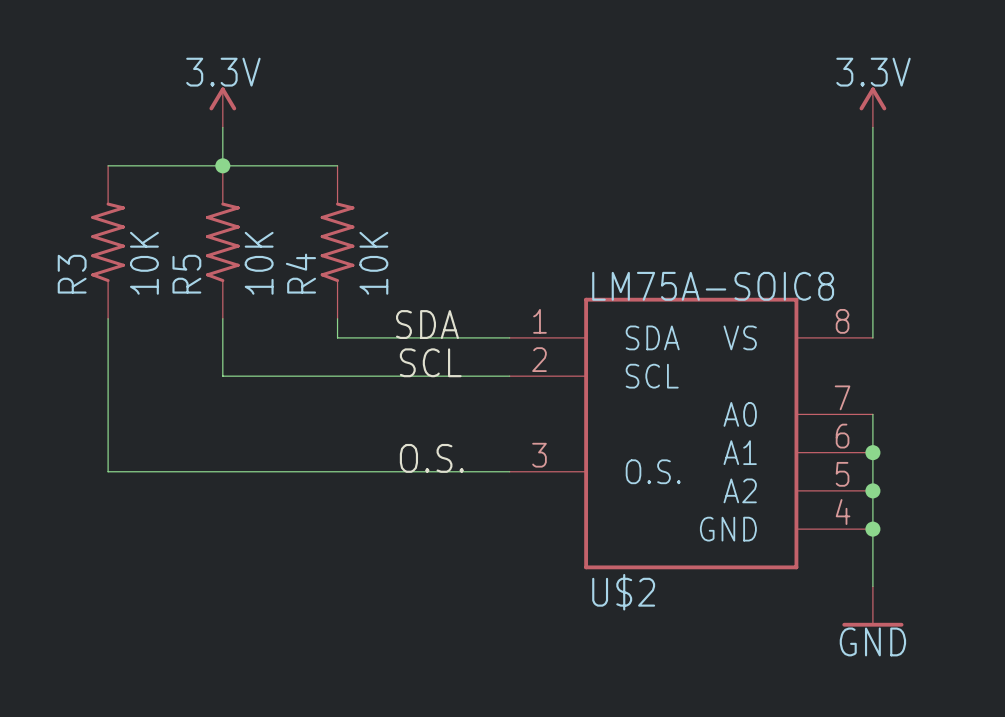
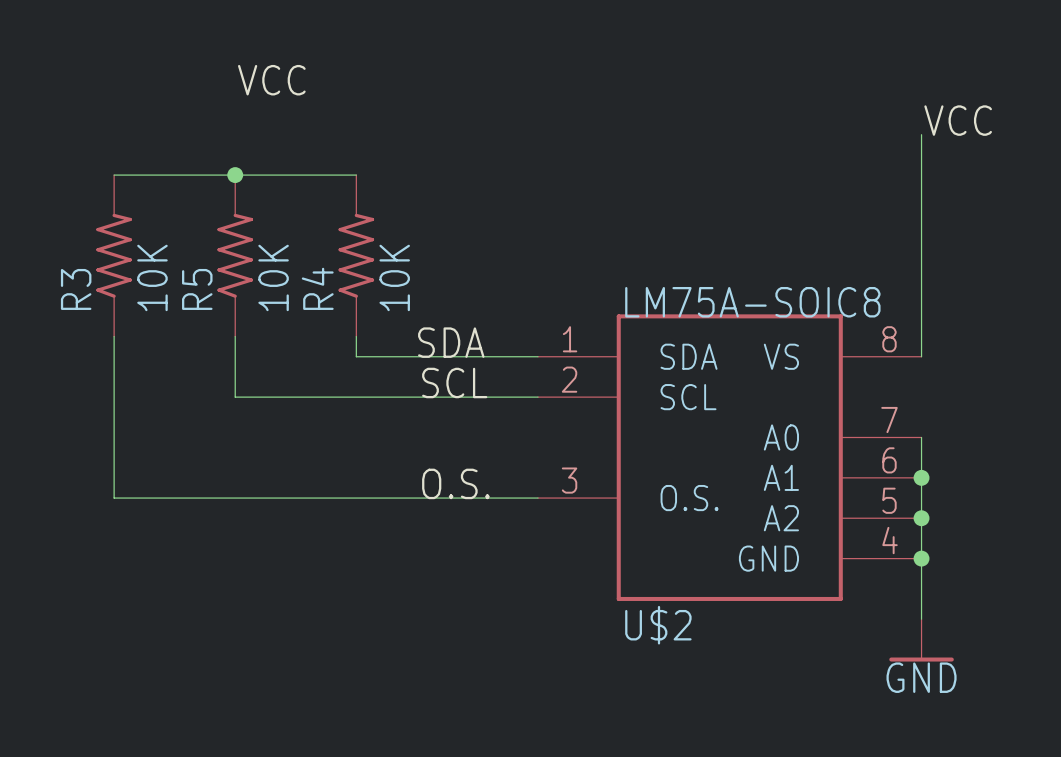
label: none -> VCC (271, 80)
power symbol: 3.3V (222, 107) -> none
power symbol: 3.3V (872, 107) -> none
label: none -> VCC (958, 120)
wire: (222, 127) (222, 165) -> none

